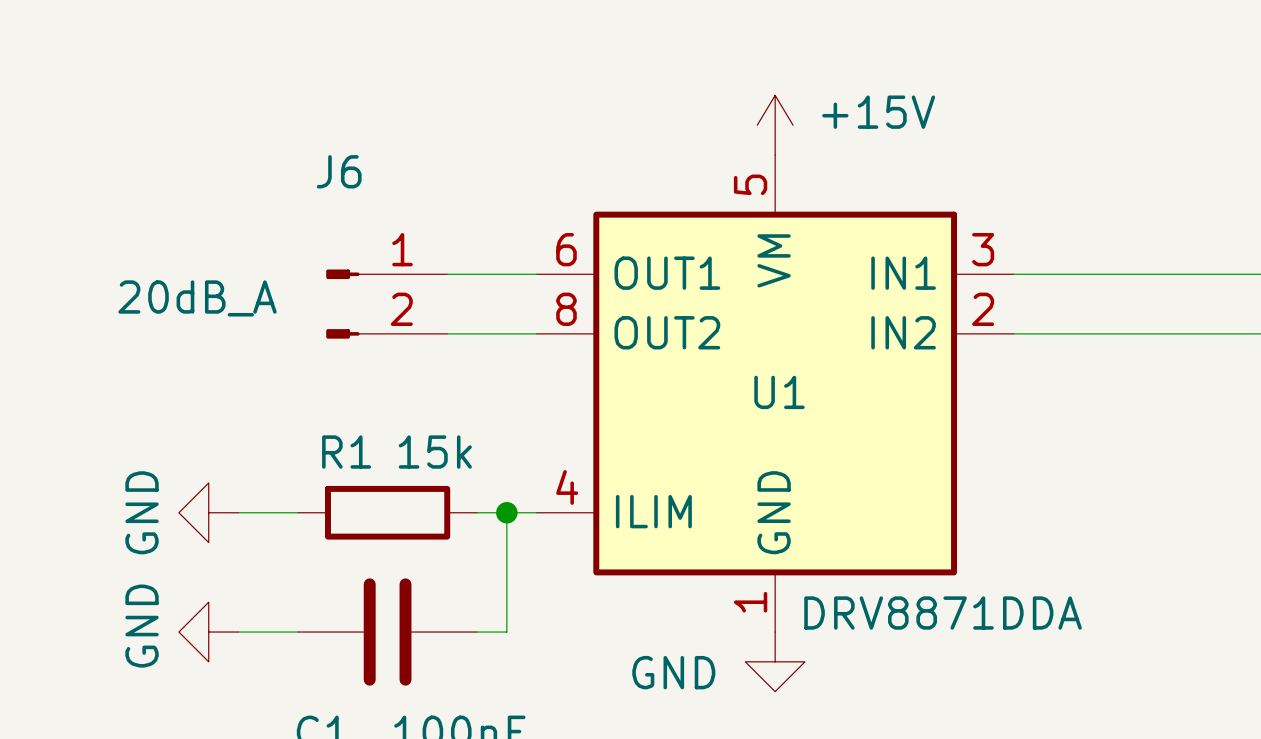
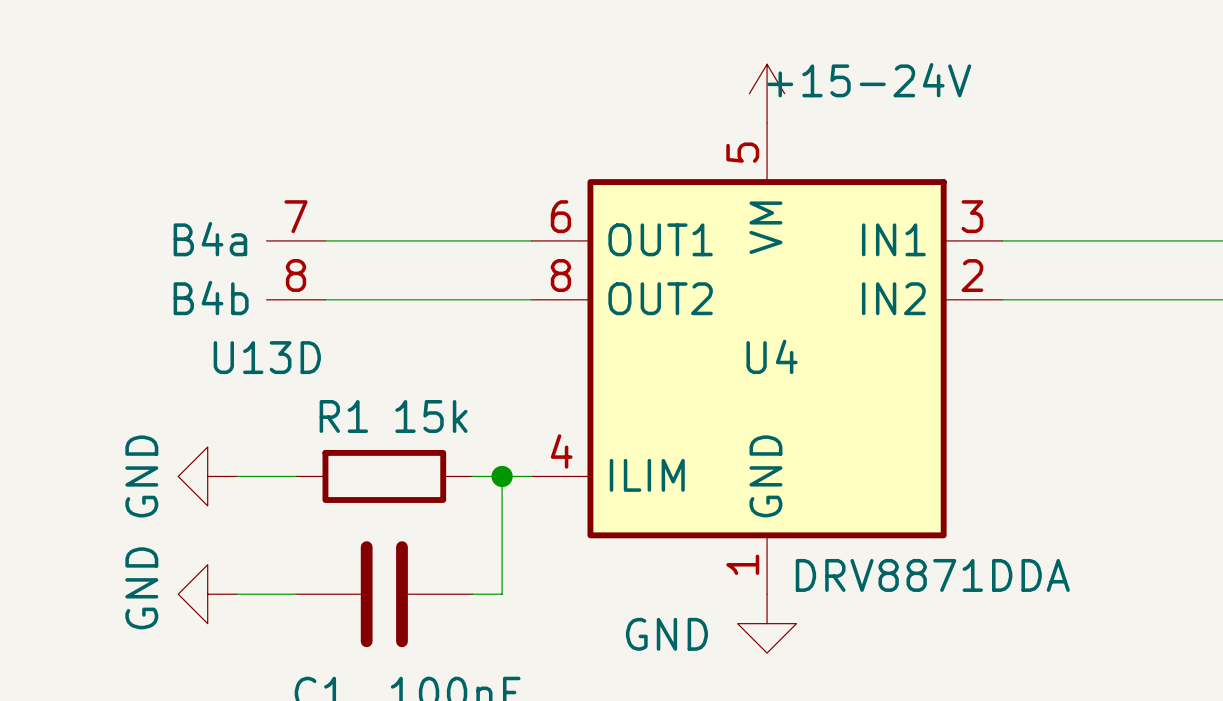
power symbol: +15V (775, 125) -> +15-24V (767, 93)
U13D: none -> (296, 270)
J6: 20dB_A (386, 304) -> none
U1 name: U1 (779, 392) -> U4 (772, 356)

